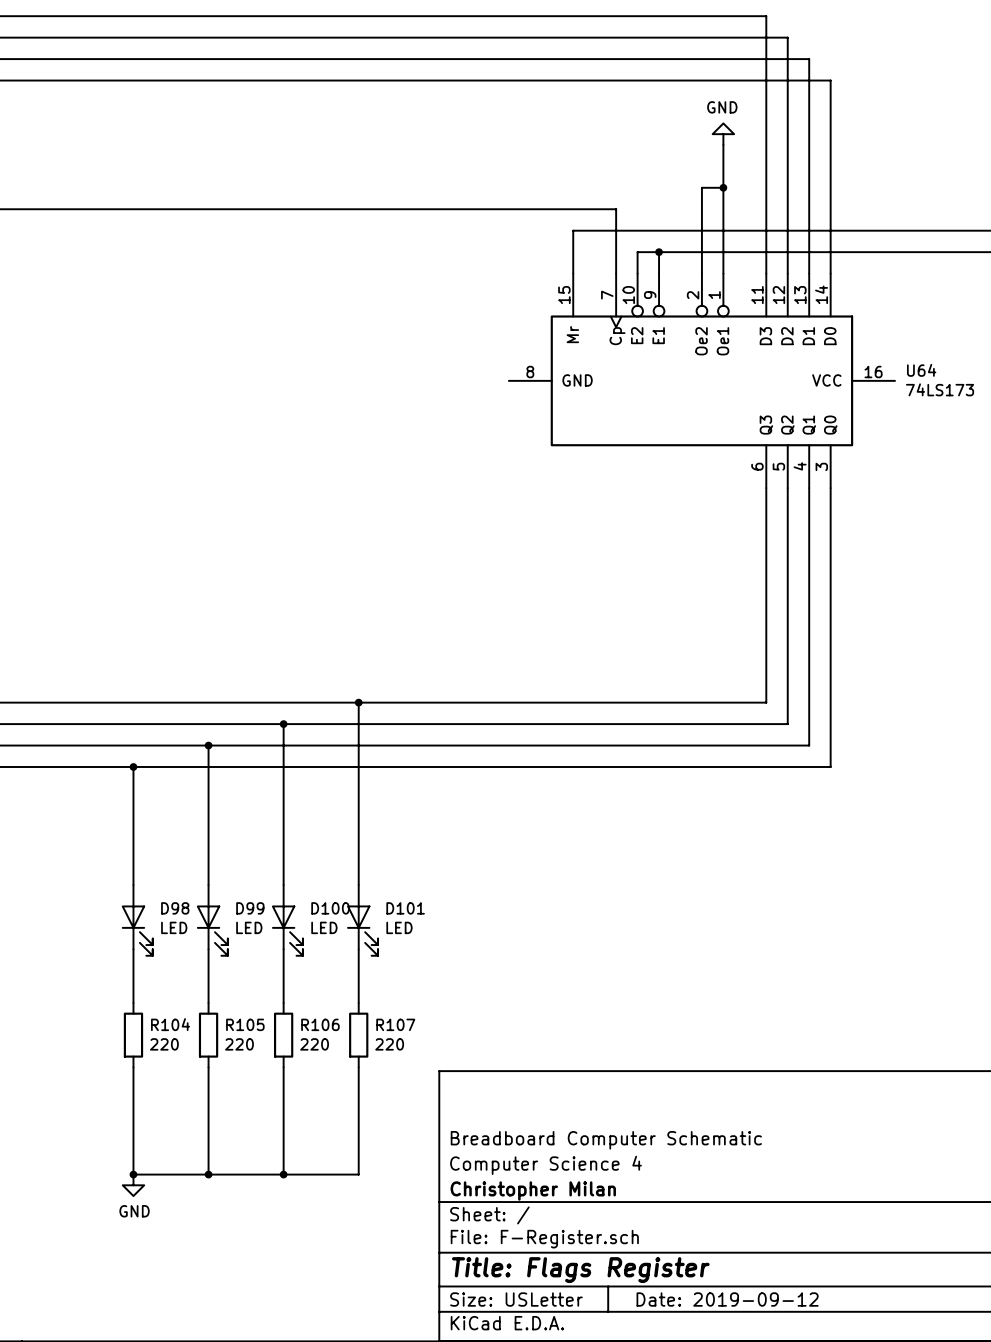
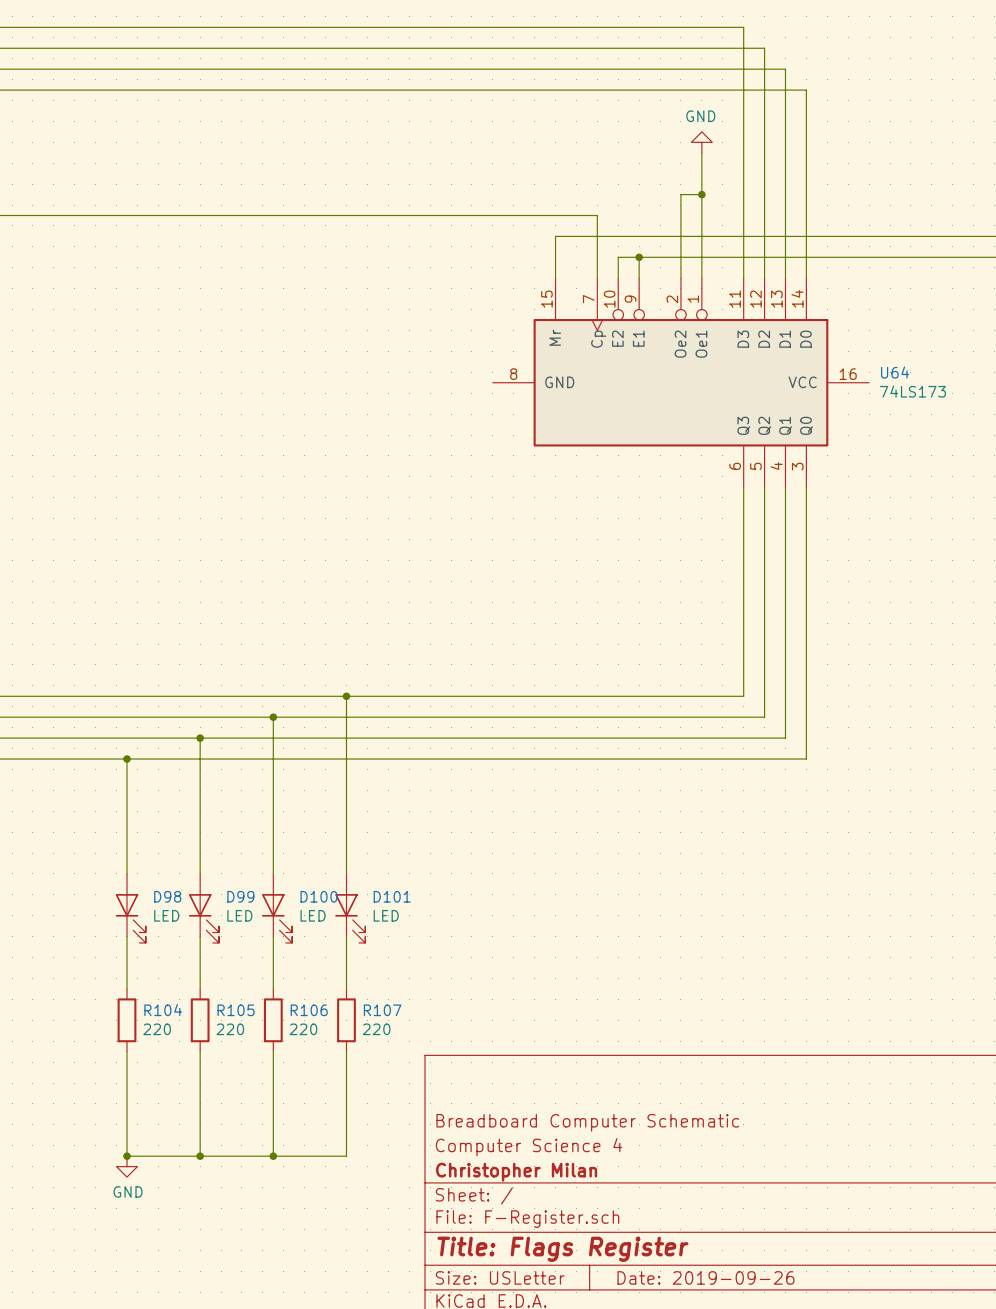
title block: Date: 2019-09-12 (727, 1299) -> Date: 2019-09-26 (705, 1277)

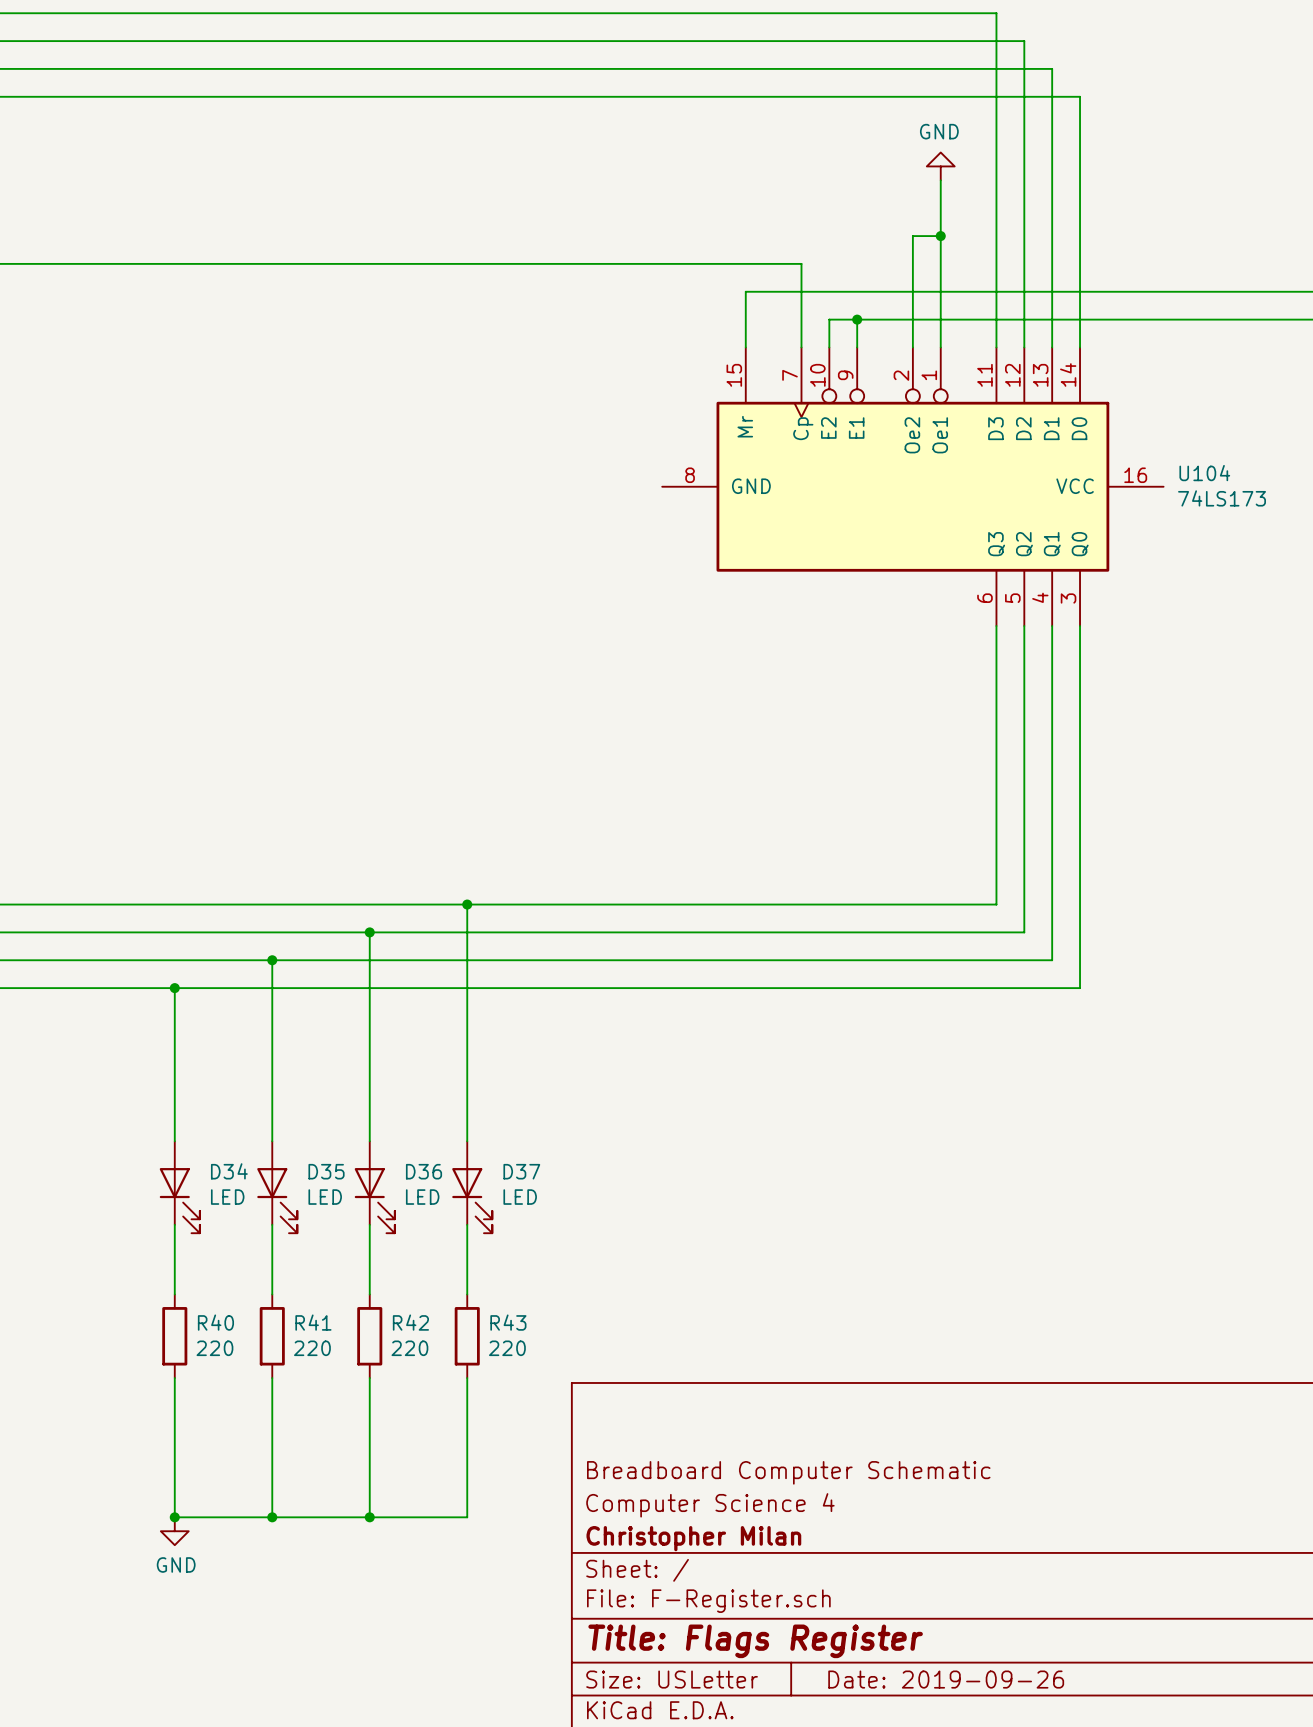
U64 name: U64 (895, 372) -> U104 (1204, 473)
D98 name: D98 (167, 896) -> D34 (229, 1171)
D99 name: D99 (240, 896) -> D35 (326, 1171)
D100 name: D100 (319, 896) -> D36 (424, 1171)
D101 name: D101 (392, 896) -> D37 (521, 1171)
R104 name: R104 (163, 1010) -> R40 (215, 1322)
R105 name: R105 (236, 1010) -> R41 (313, 1322)
R106 name: R106 (309, 1010) -> R42 (410, 1322)
R107 name: R107 (382, 1010) -> R43 (508, 1322)

